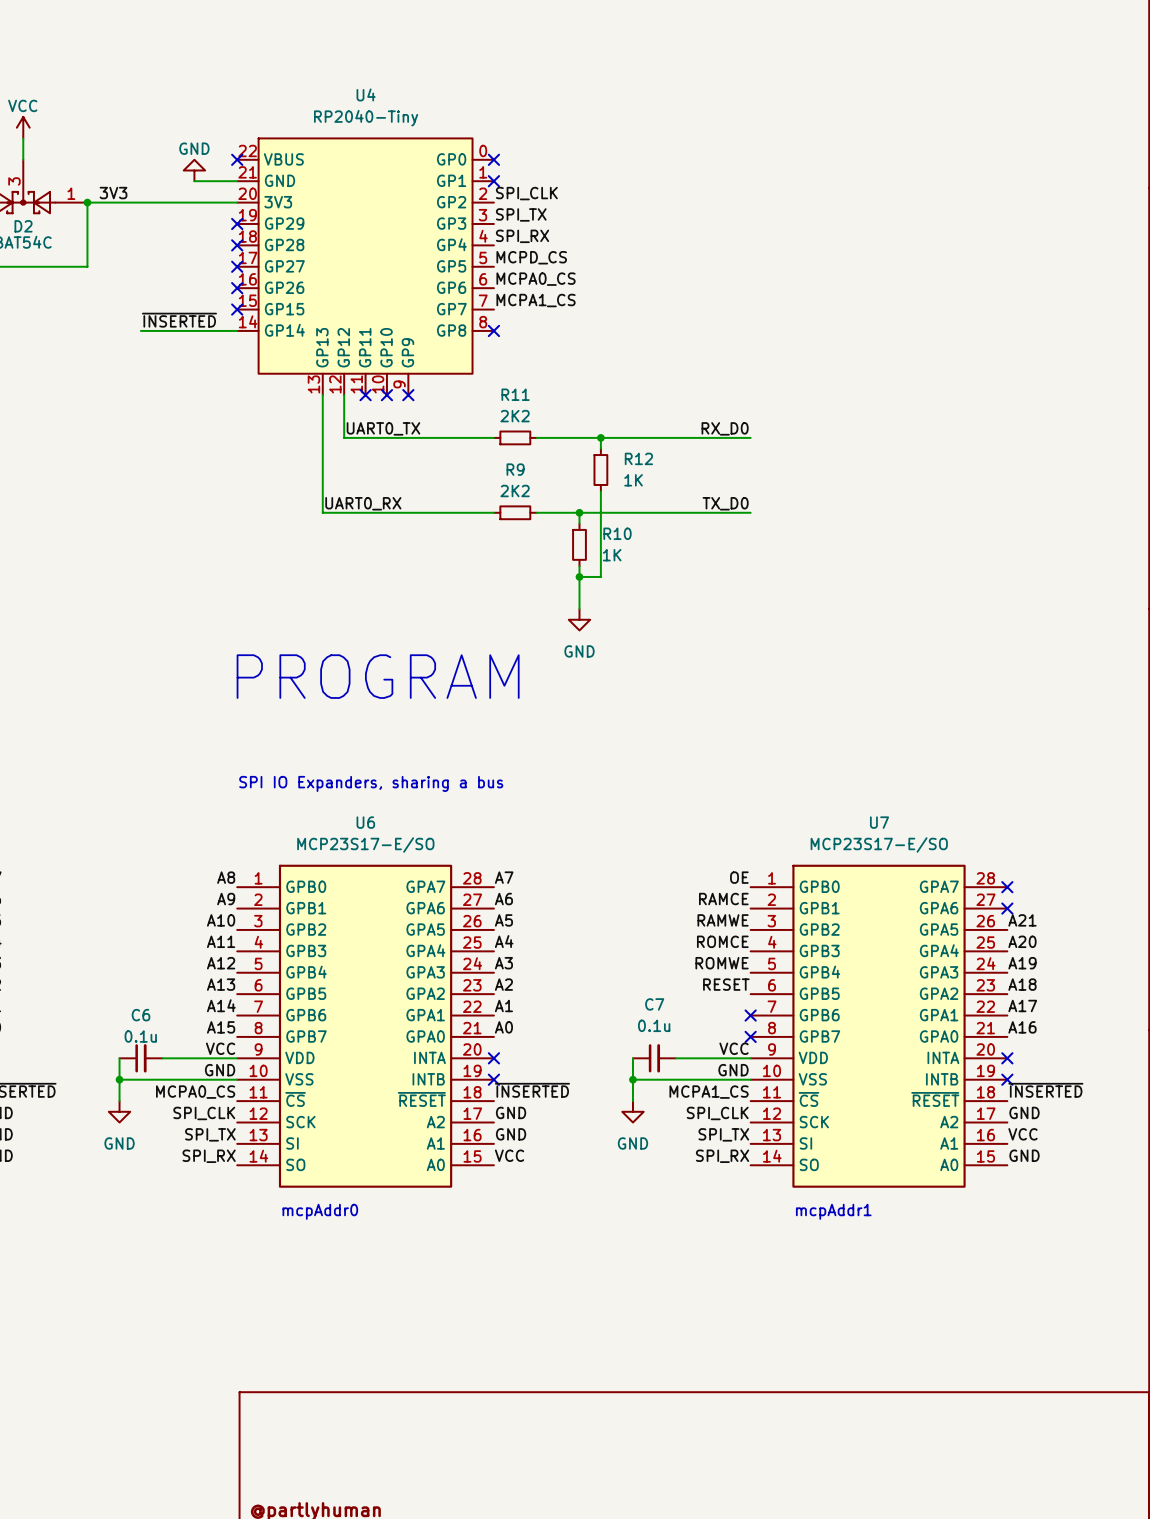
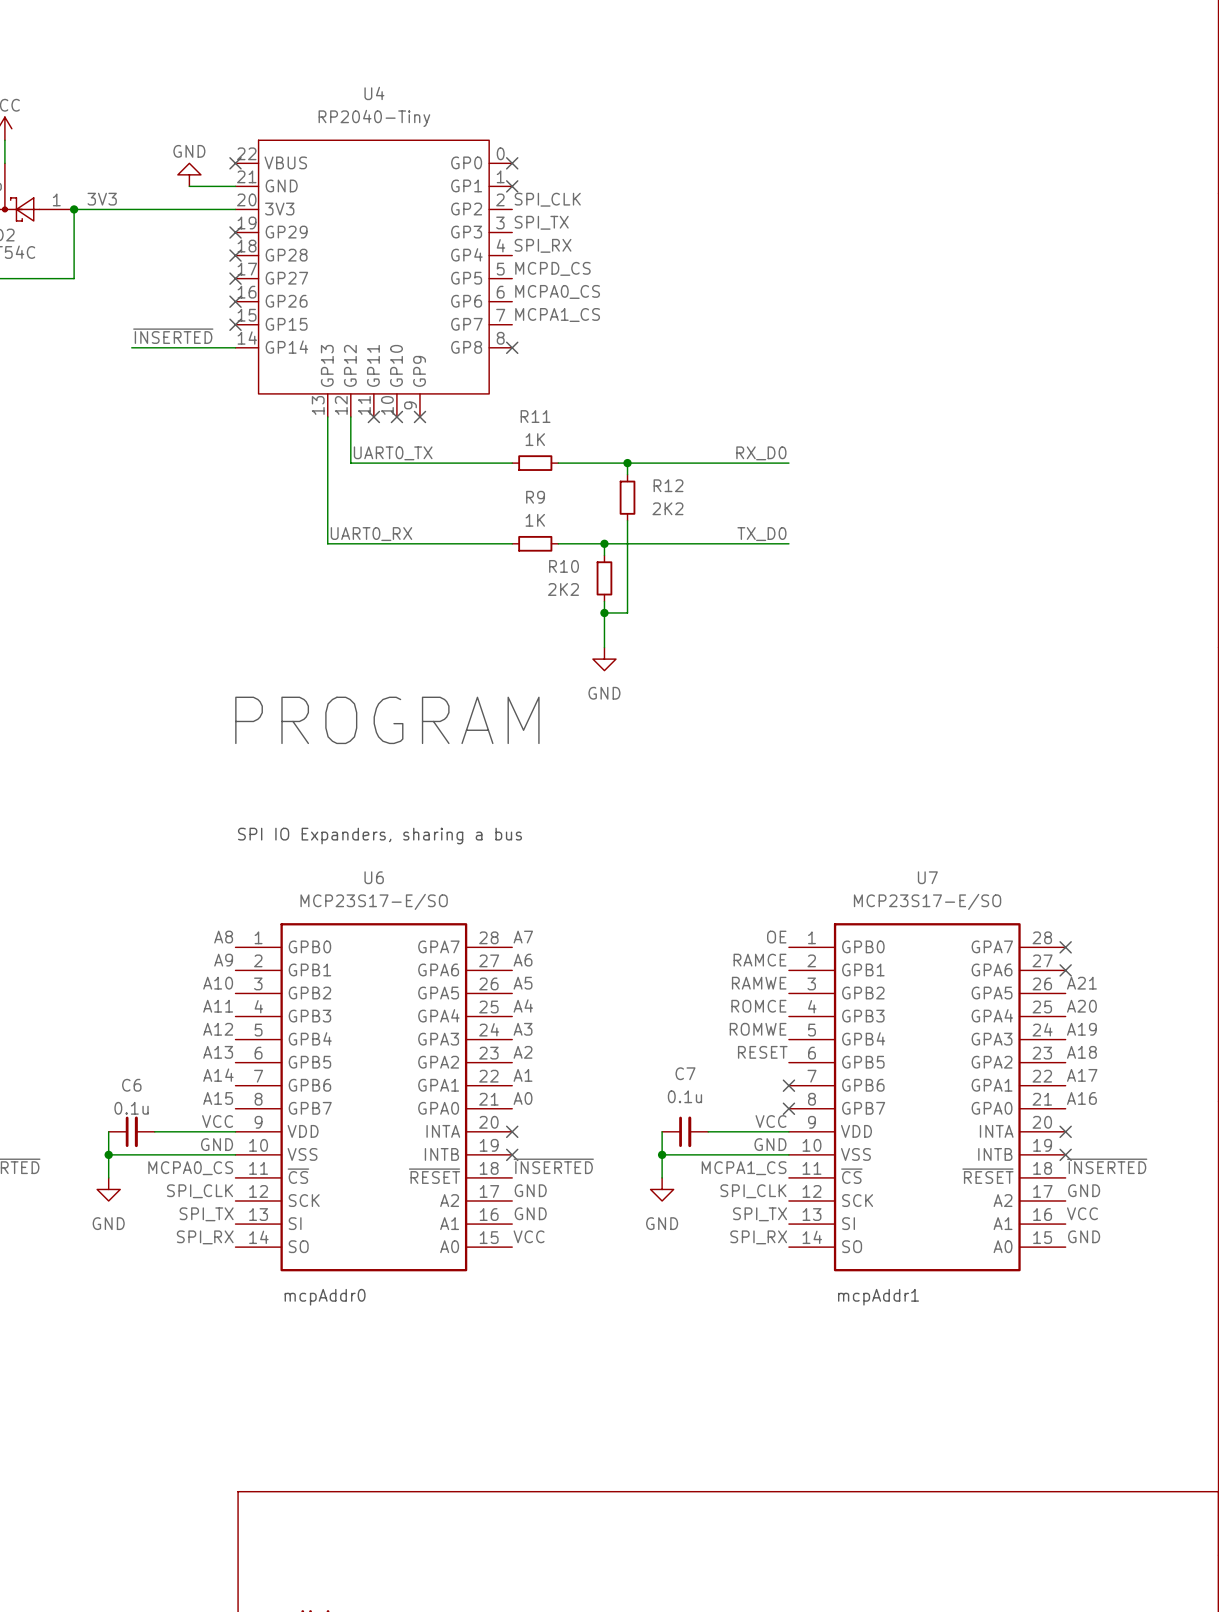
R11 value: 2K2 (515, 416) -> 1K (535, 439)
R12 value: 1K (633, 480) -> 2K2 (667, 508)
R9 value: 2K2 (515, 491) -> 1K (535, 520)
R10 name position: R10 (617, 533) -> R10 (564, 566)
R10 value: 1K (612, 555) -> 2K2 (563, 589)

